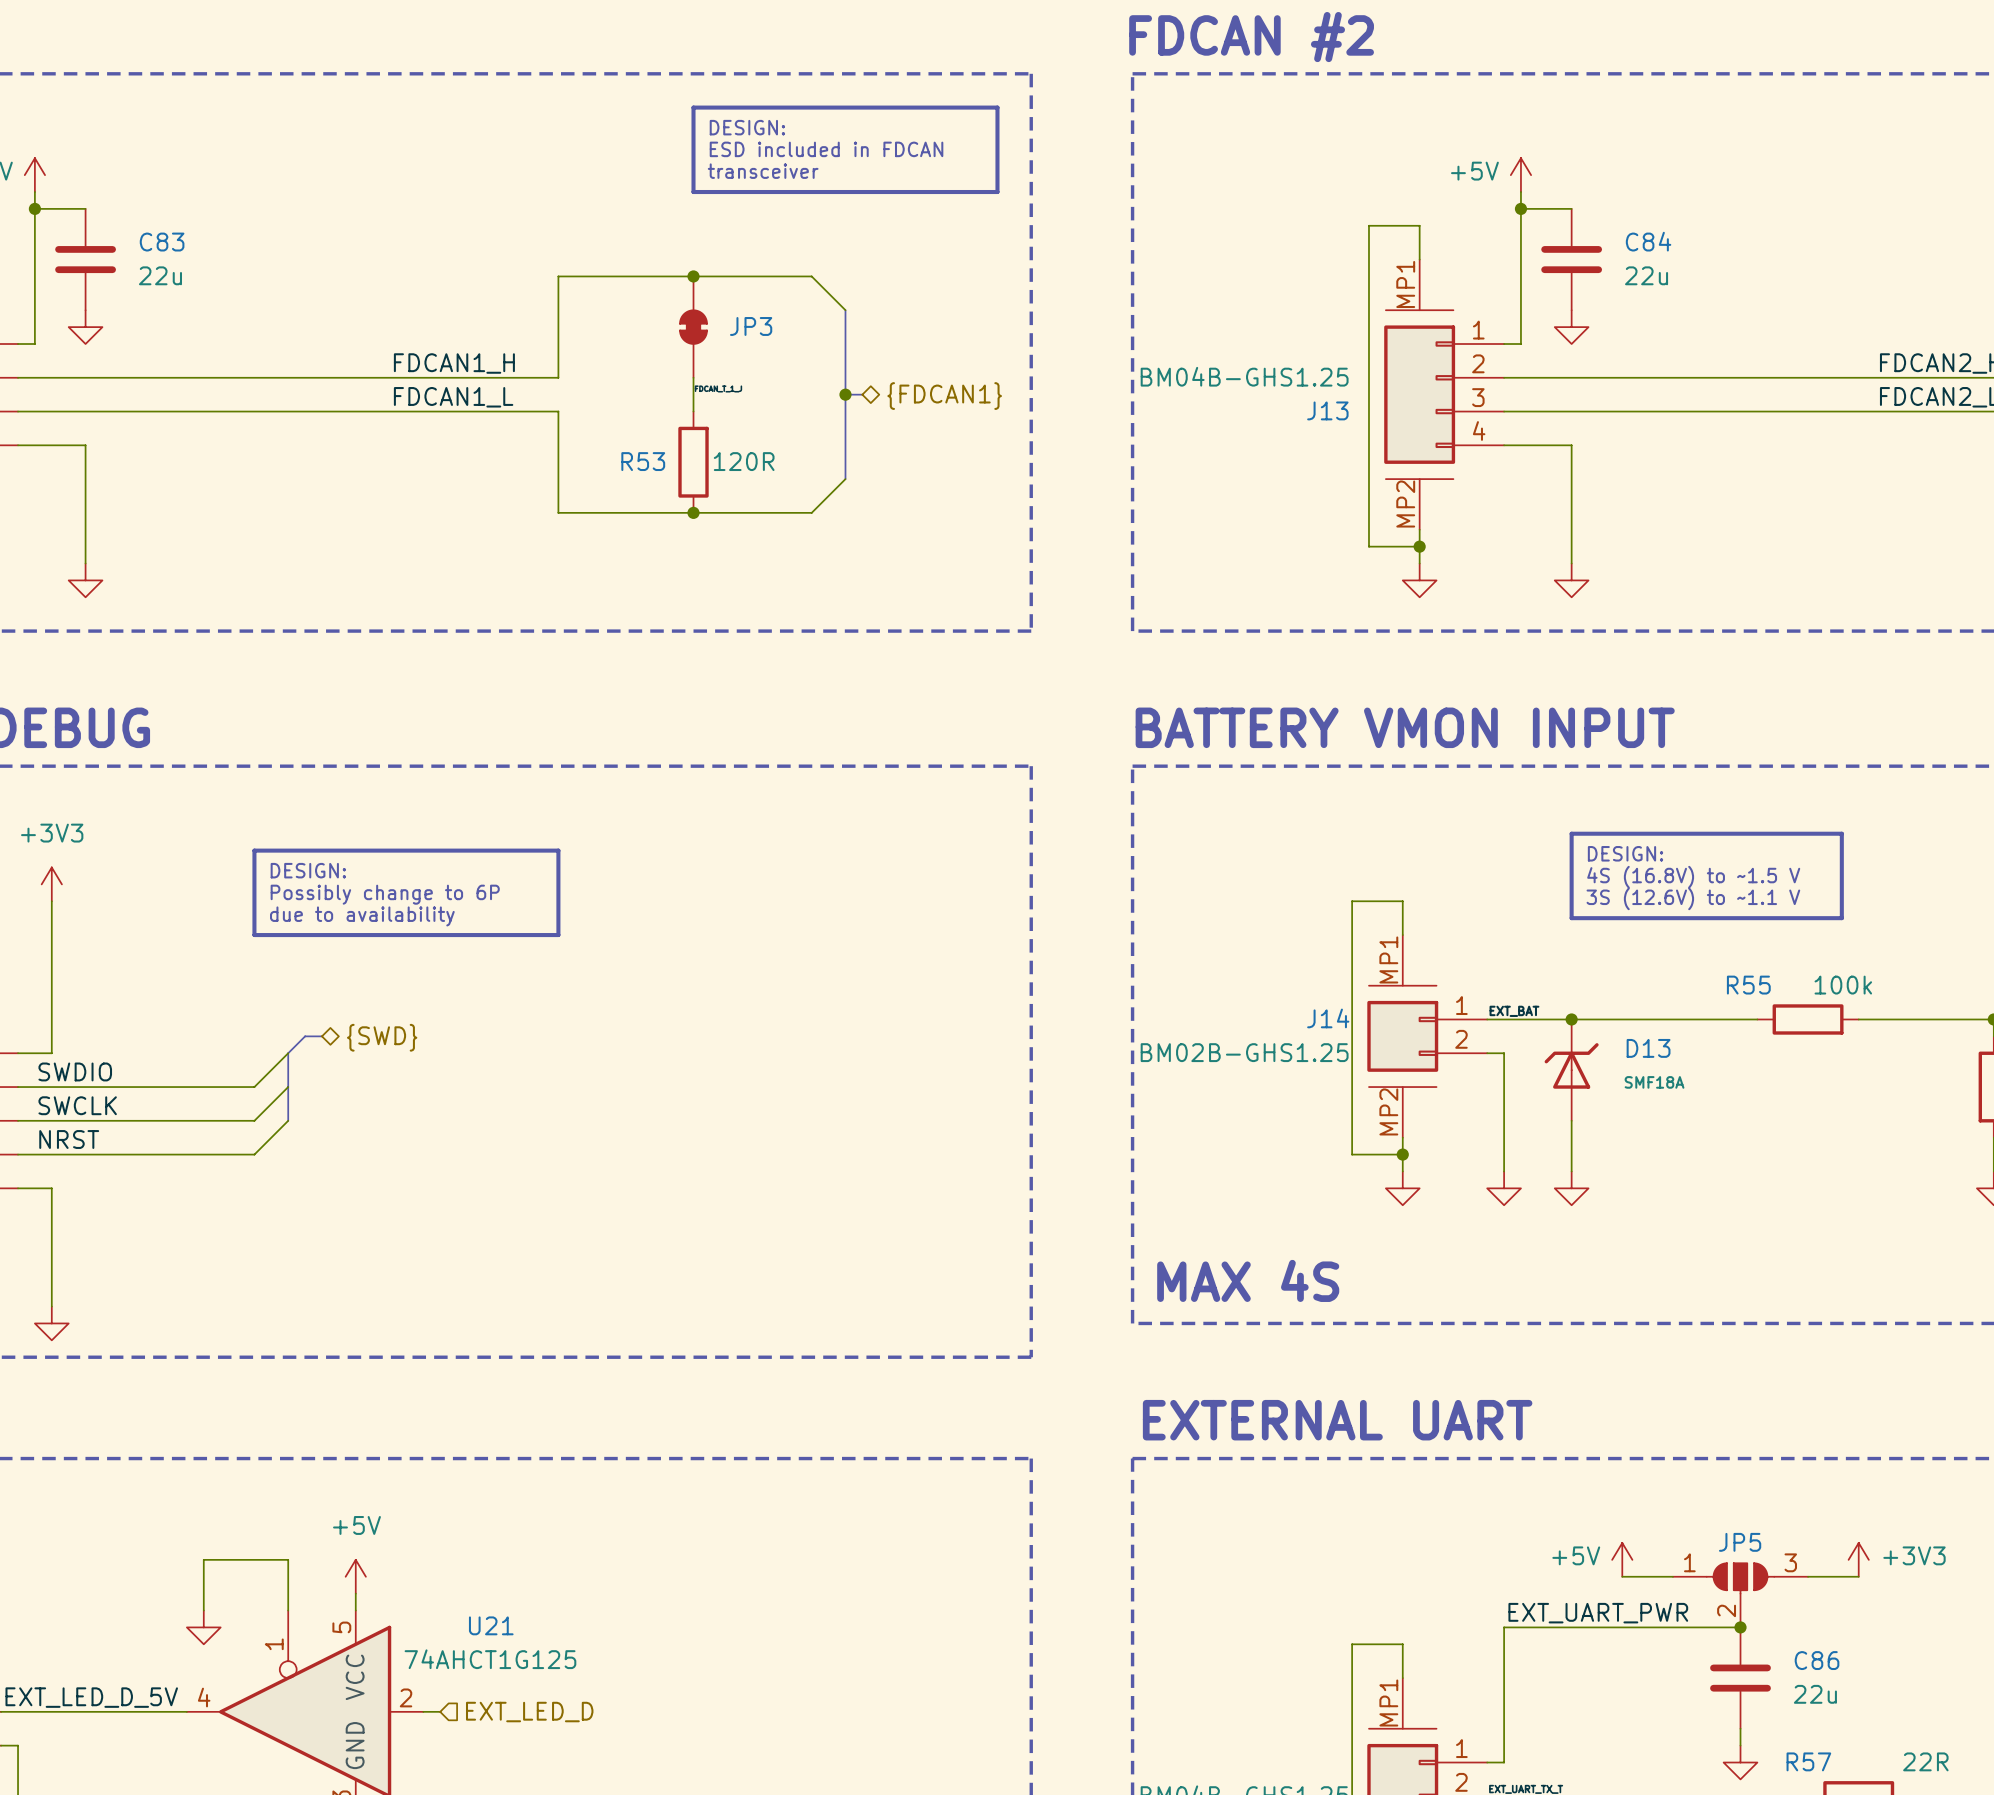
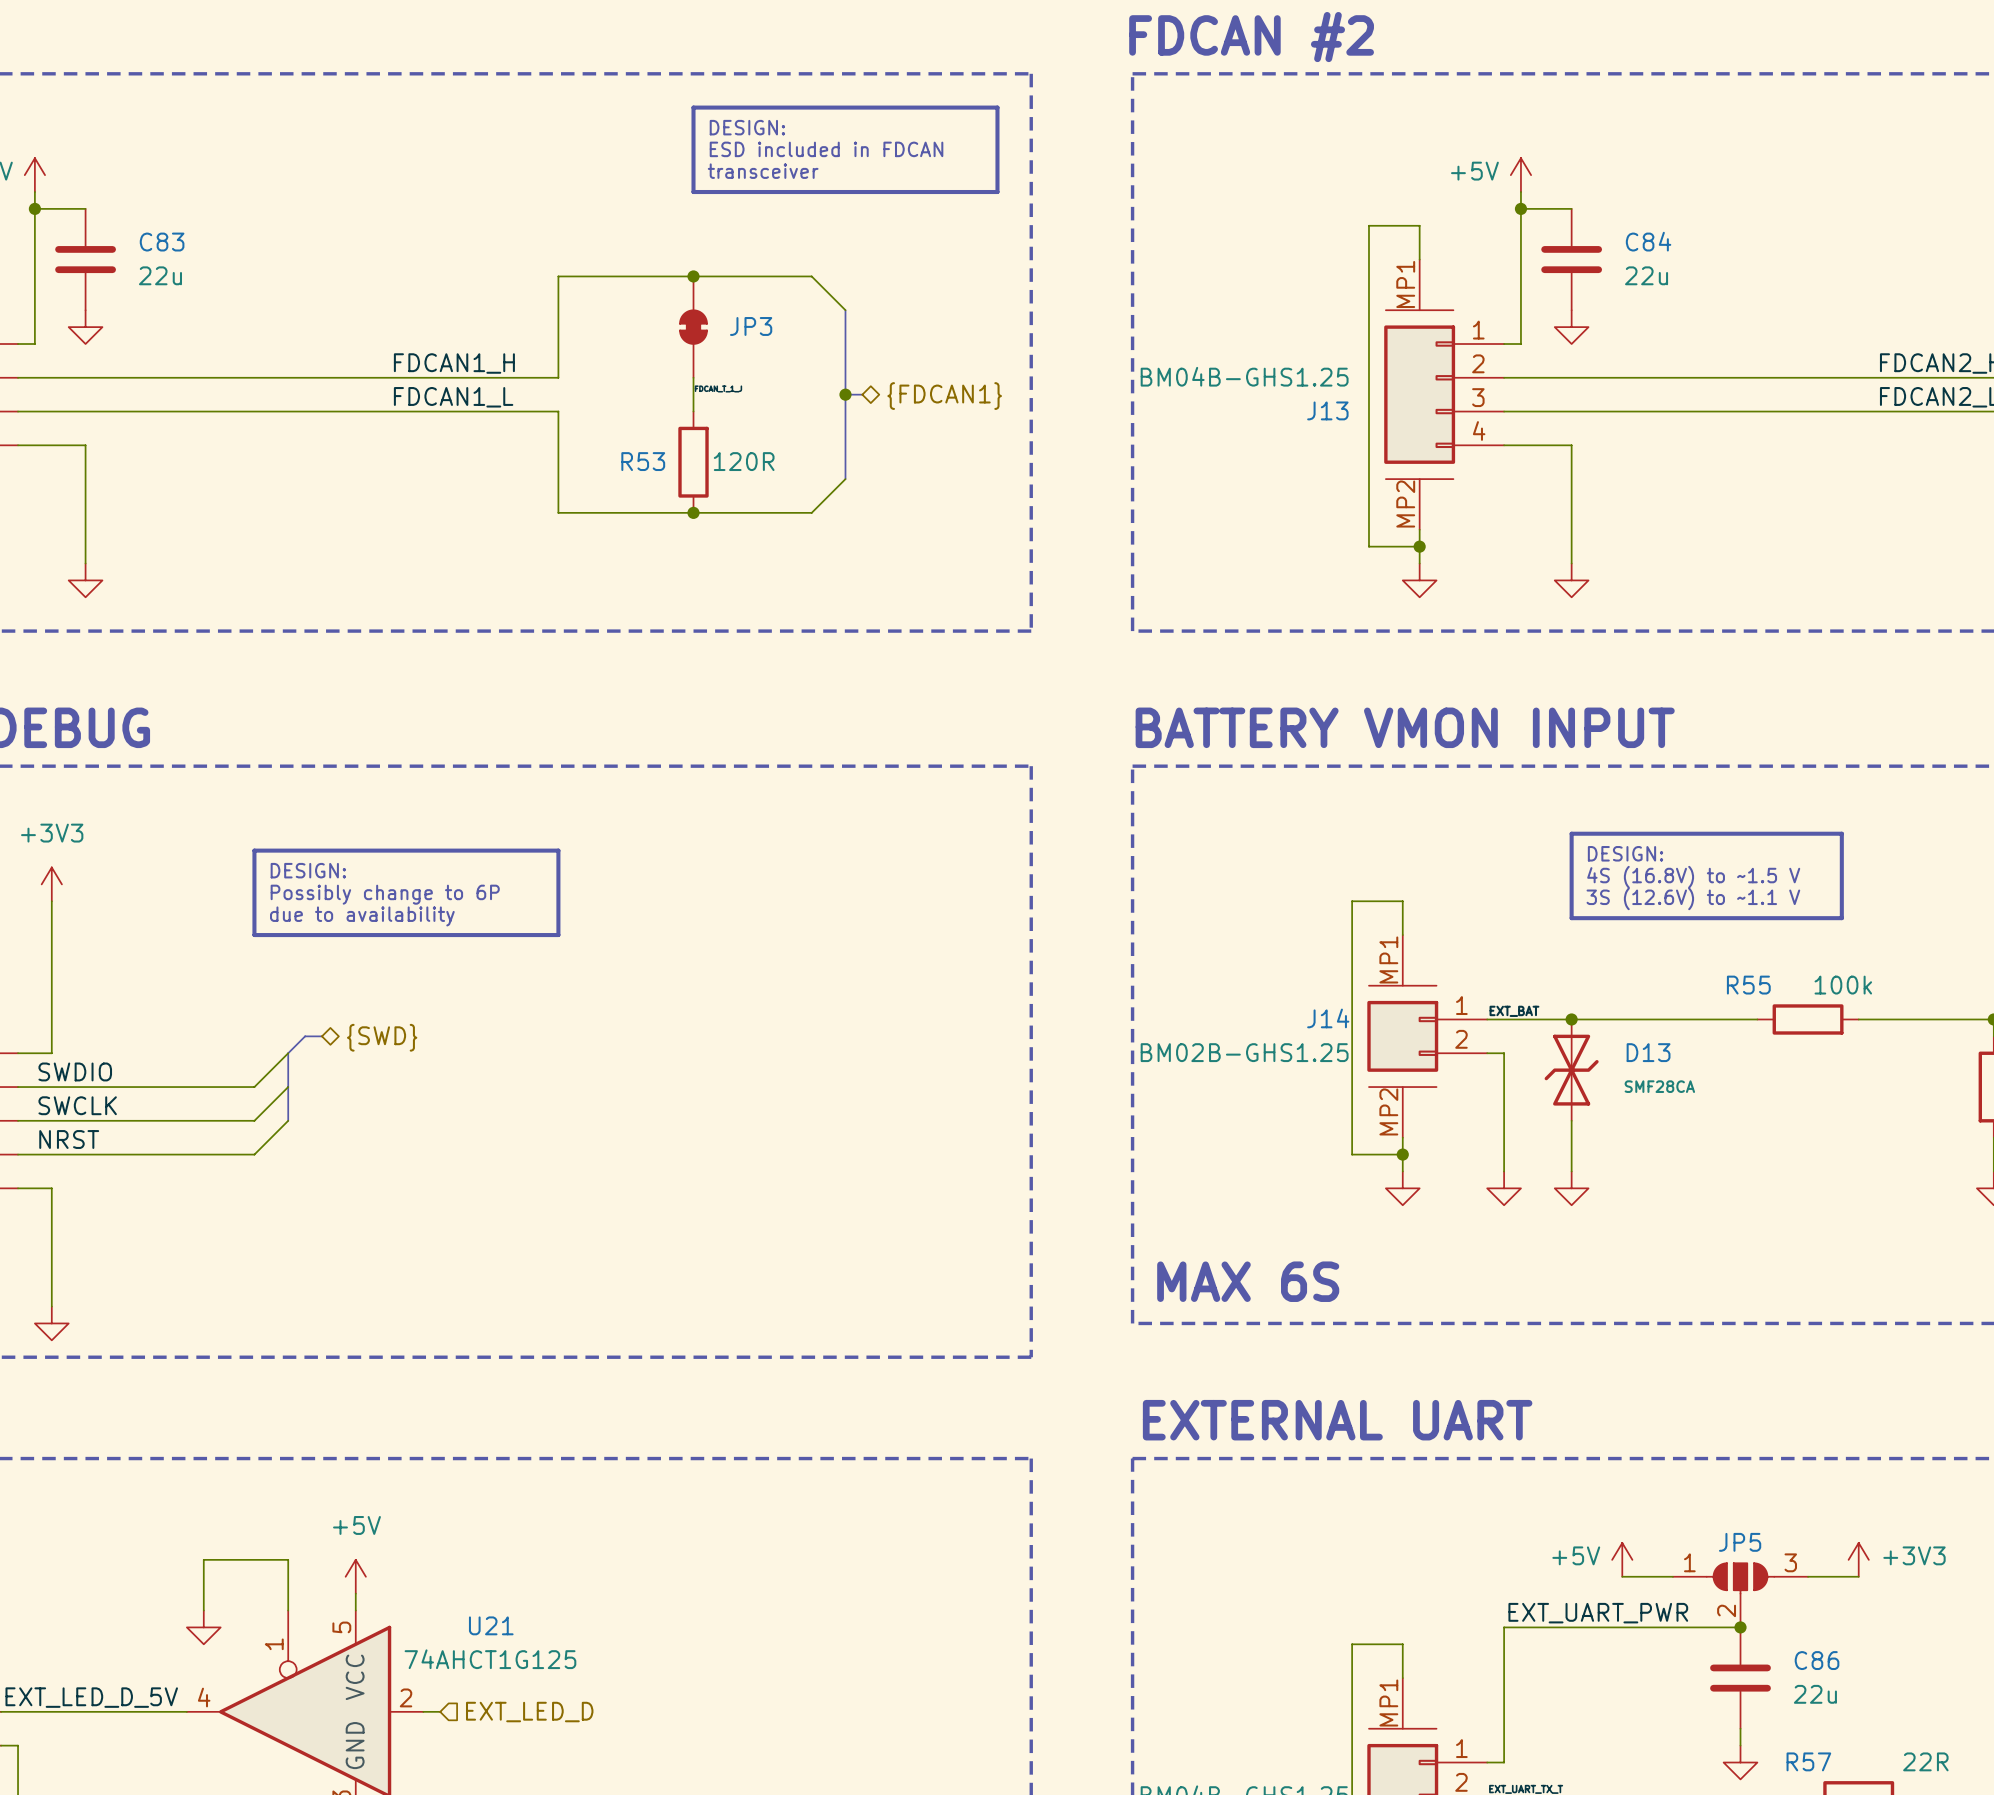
D13 symbol: [1544, 1019, 1599, 1121] -> [1544, 1019, 1599, 1121]
D13 value: SMF18A (1654, 1082) -> SMF28CA (1659, 1086)
text: MAX 4S (1248, 1280) -> MAX 6S (1248, 1281)

